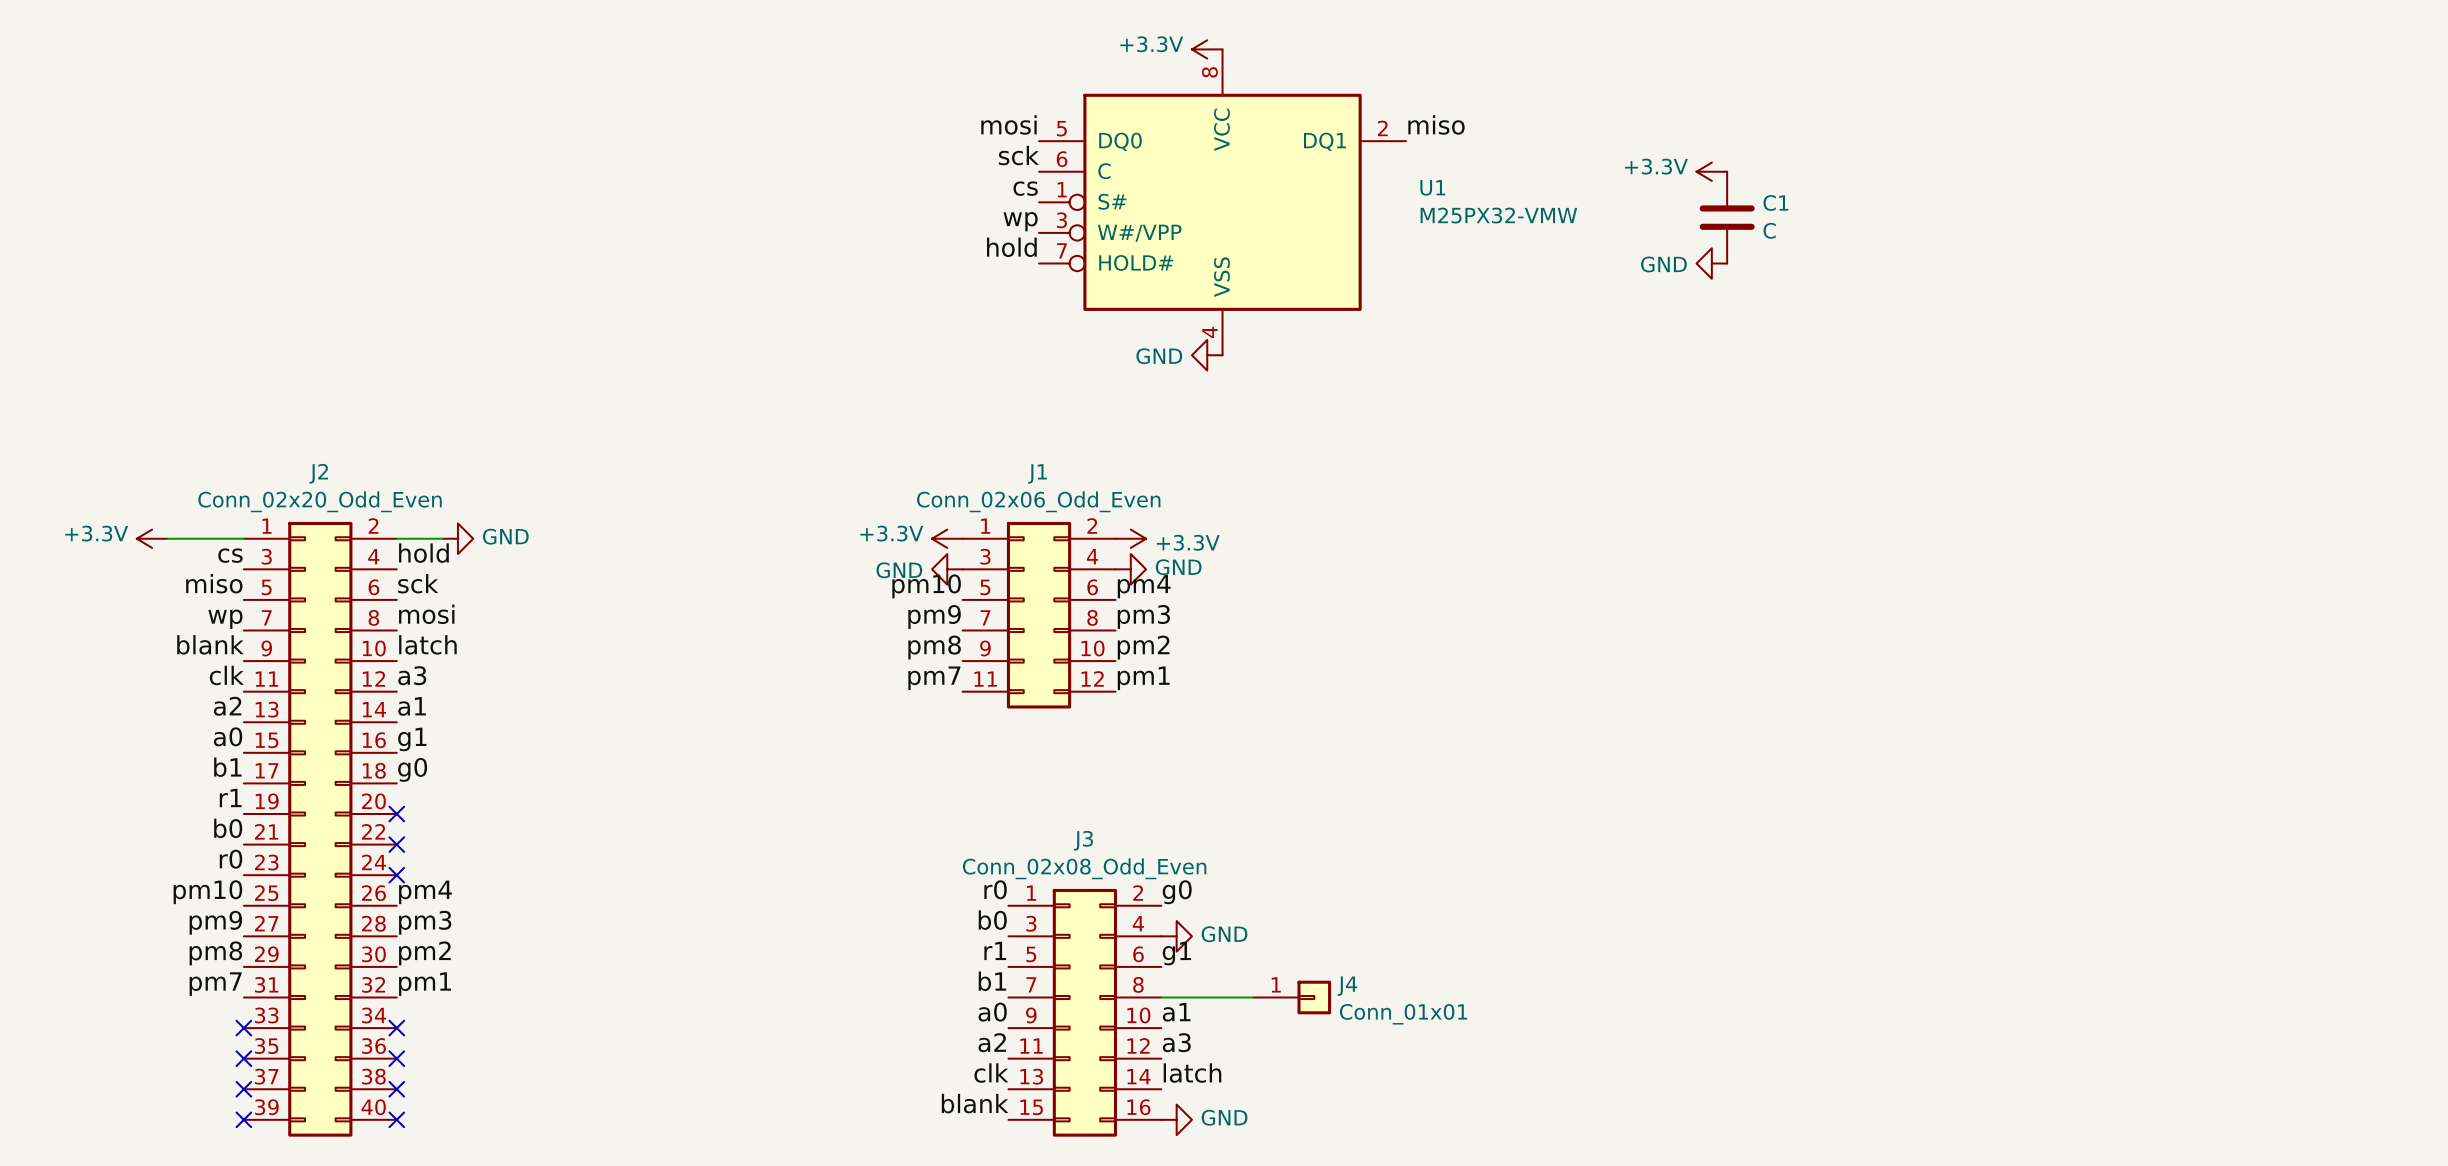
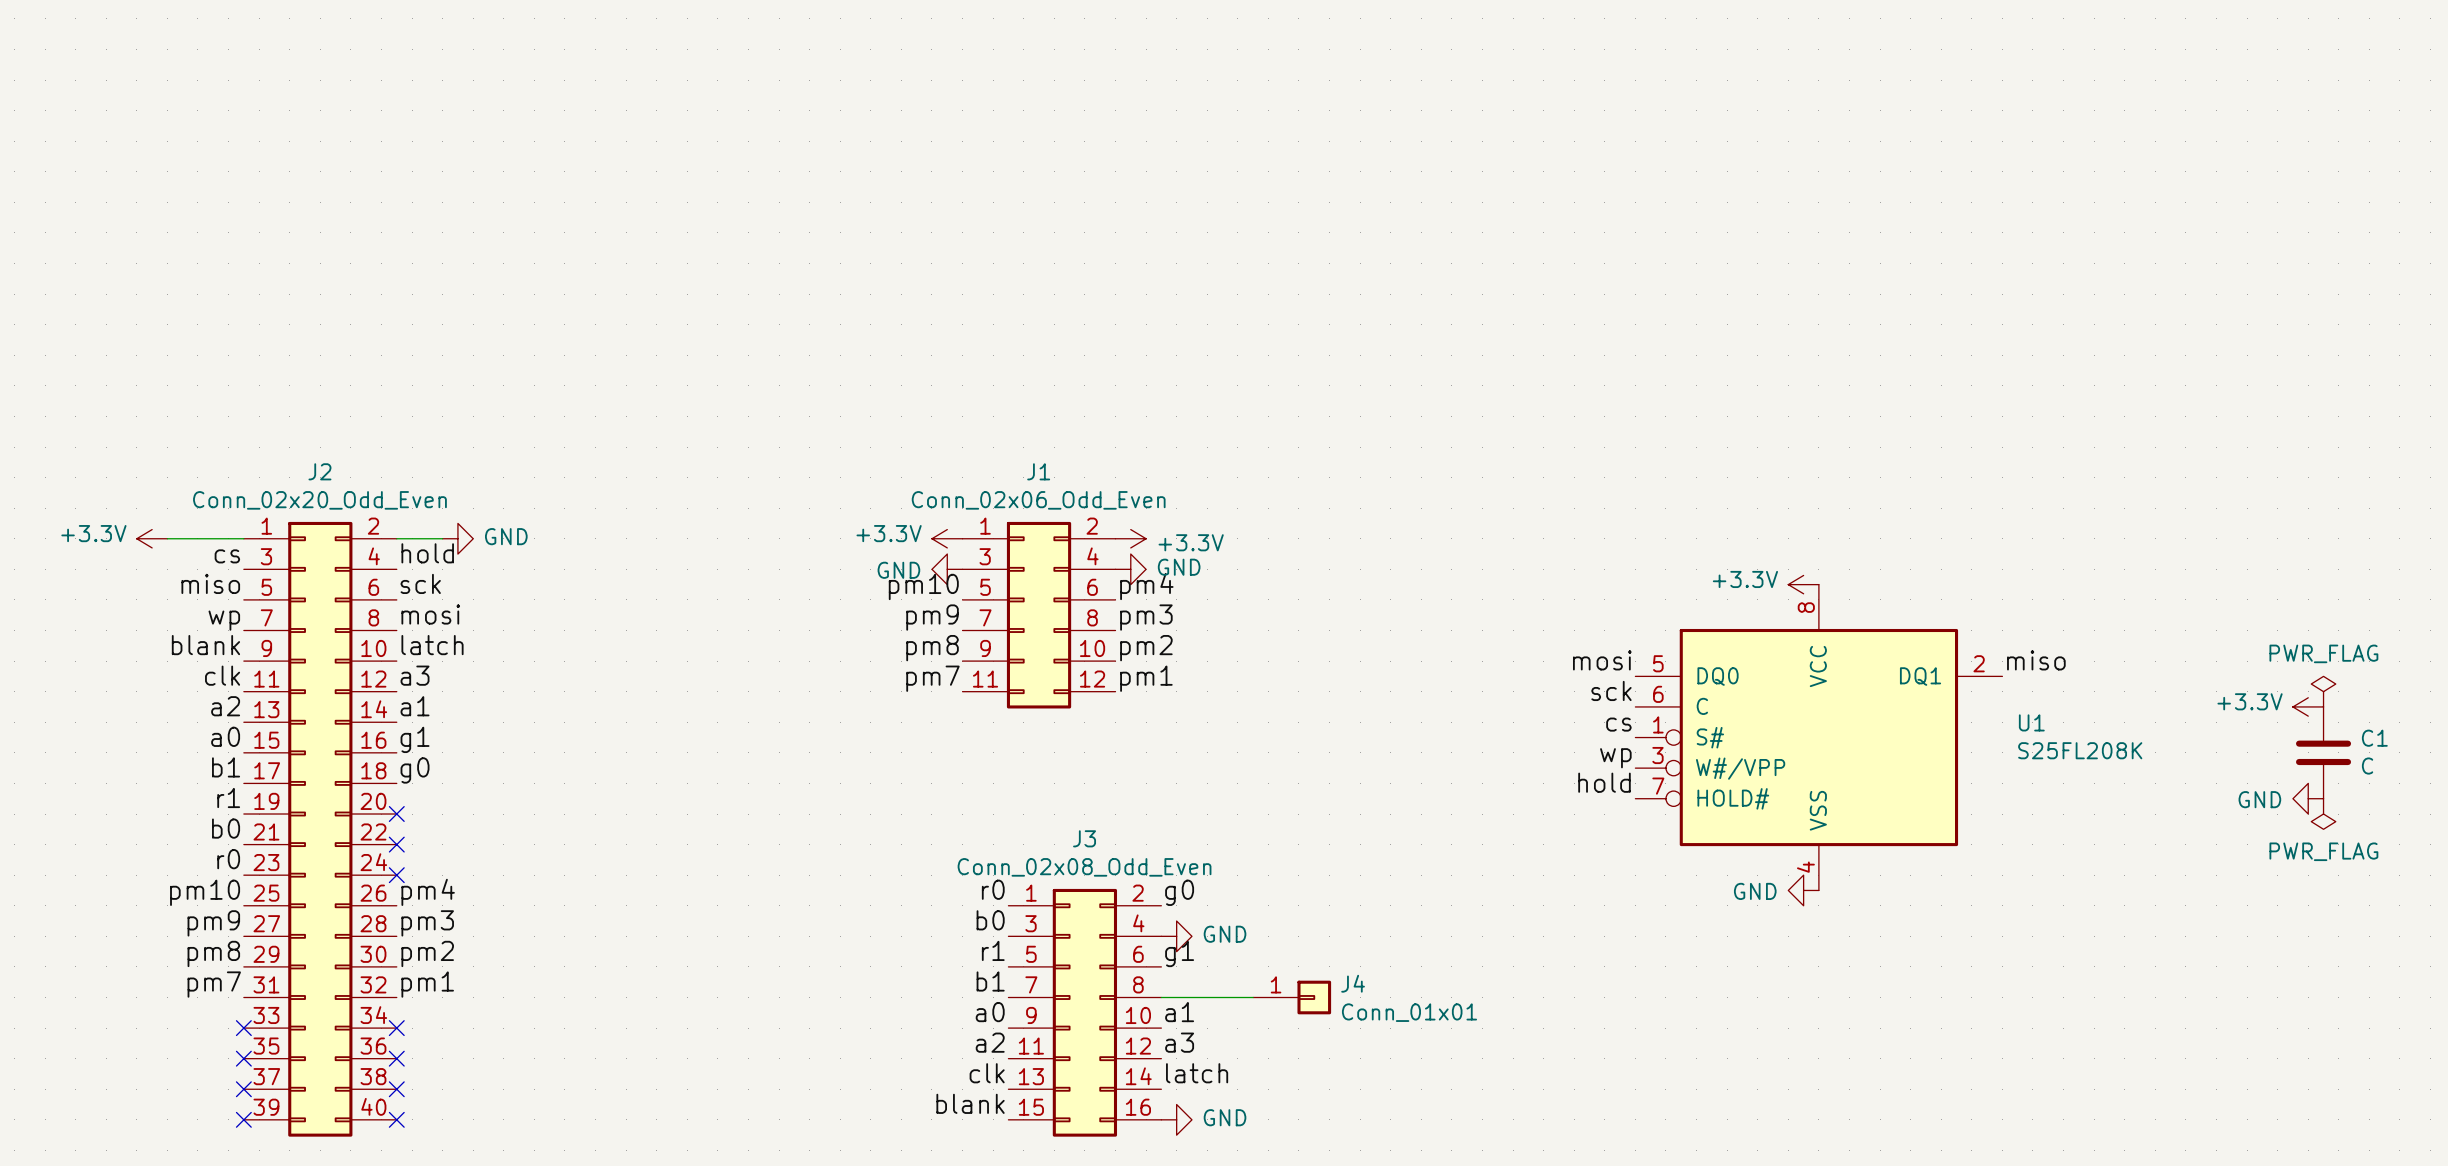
power symbol: +3.3V (1207, 49) -> none
label: mosi (1008, 124) -> none
label: miso (1436, 124) -> none
label: sck (1018, 155) -> none
power symbol: +3.3V (1711, 171) -> none
label: cs (1025, 188) -> none
U1 position: (1222, 202) -> (1818, 737)
U1 value: M25PX32-VMW (1498, 215) -> S25FL208K (2080, 750)
C1 position: (1727, 217) -> (2323, 752)
label: wp (1020, 221) -> none
label: hold (1011, 247) -> none
power symbol: GND (1711, 263) -> none
power symbol: GND (1207, 355) -> none
power symbol: none -> +3.3V (1803, 584)
label: none -> mosi (1602, 660)
label: none -> miso (2036, 660)
label: none -> sck (1611, 690)
power symbol: none -> PWR_FLAG (2323, 691)
power symbol: none -> +3.3V (2308, 706)
label: none -> cs (1618, 724)
label: none -> wp (1615, 758)
label: none -> hold (1604, 782)
power symbol: none -> GND (2308, 798)
power symbol: none -> PWR_FLAG (2323, 814)
power symbol: none -> GND (1803, 890)

